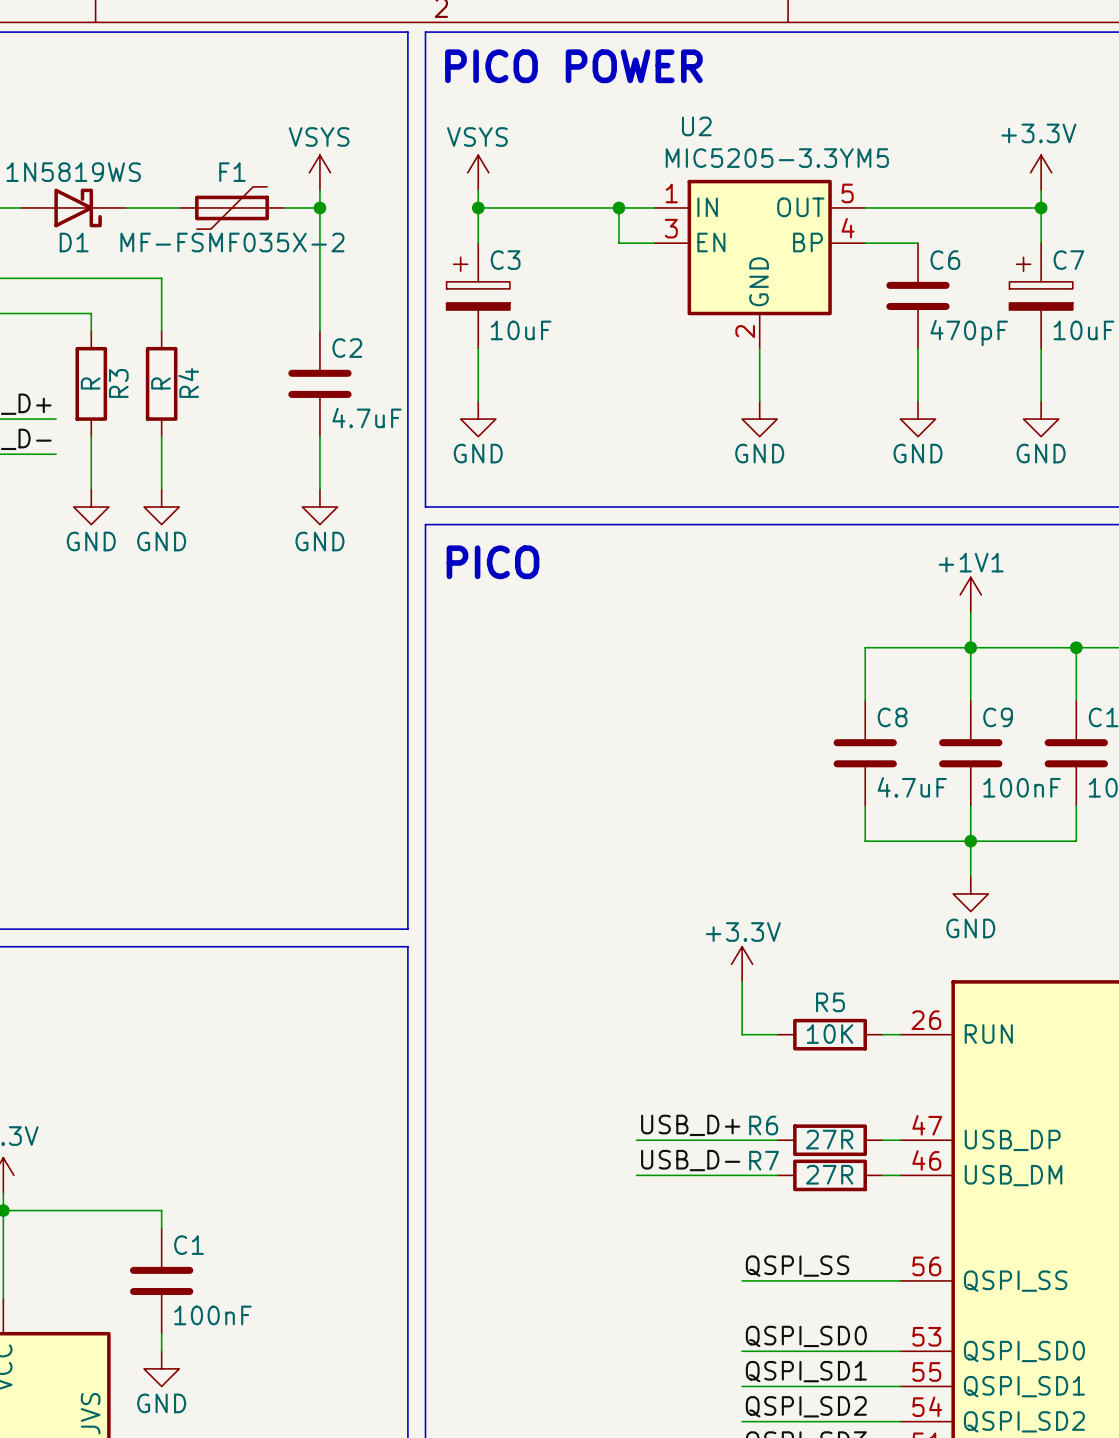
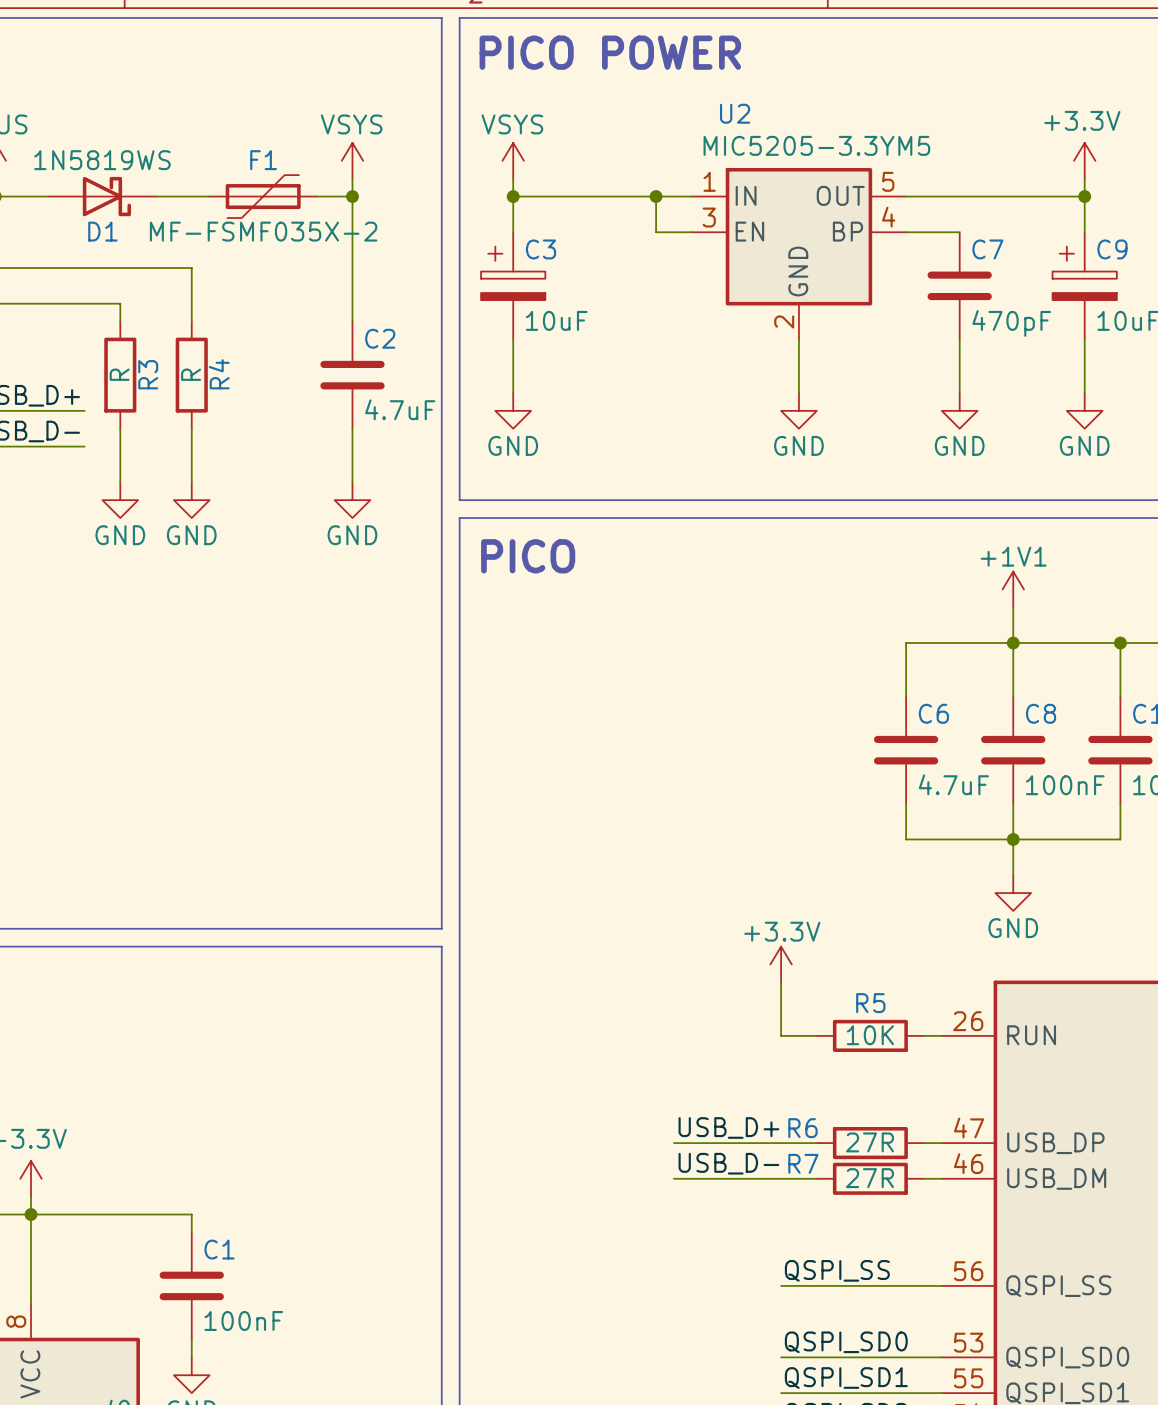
C6 name: C6 (945, 260) -> C7 (987, 249)
C7 name: C7 (1068, 260) -> C9 (1112, 249)
C8 name: C8 (892, 717) -> C6 (933, 713)
C9 name: C9 (998, 717) -> C8 (1041, 713)

